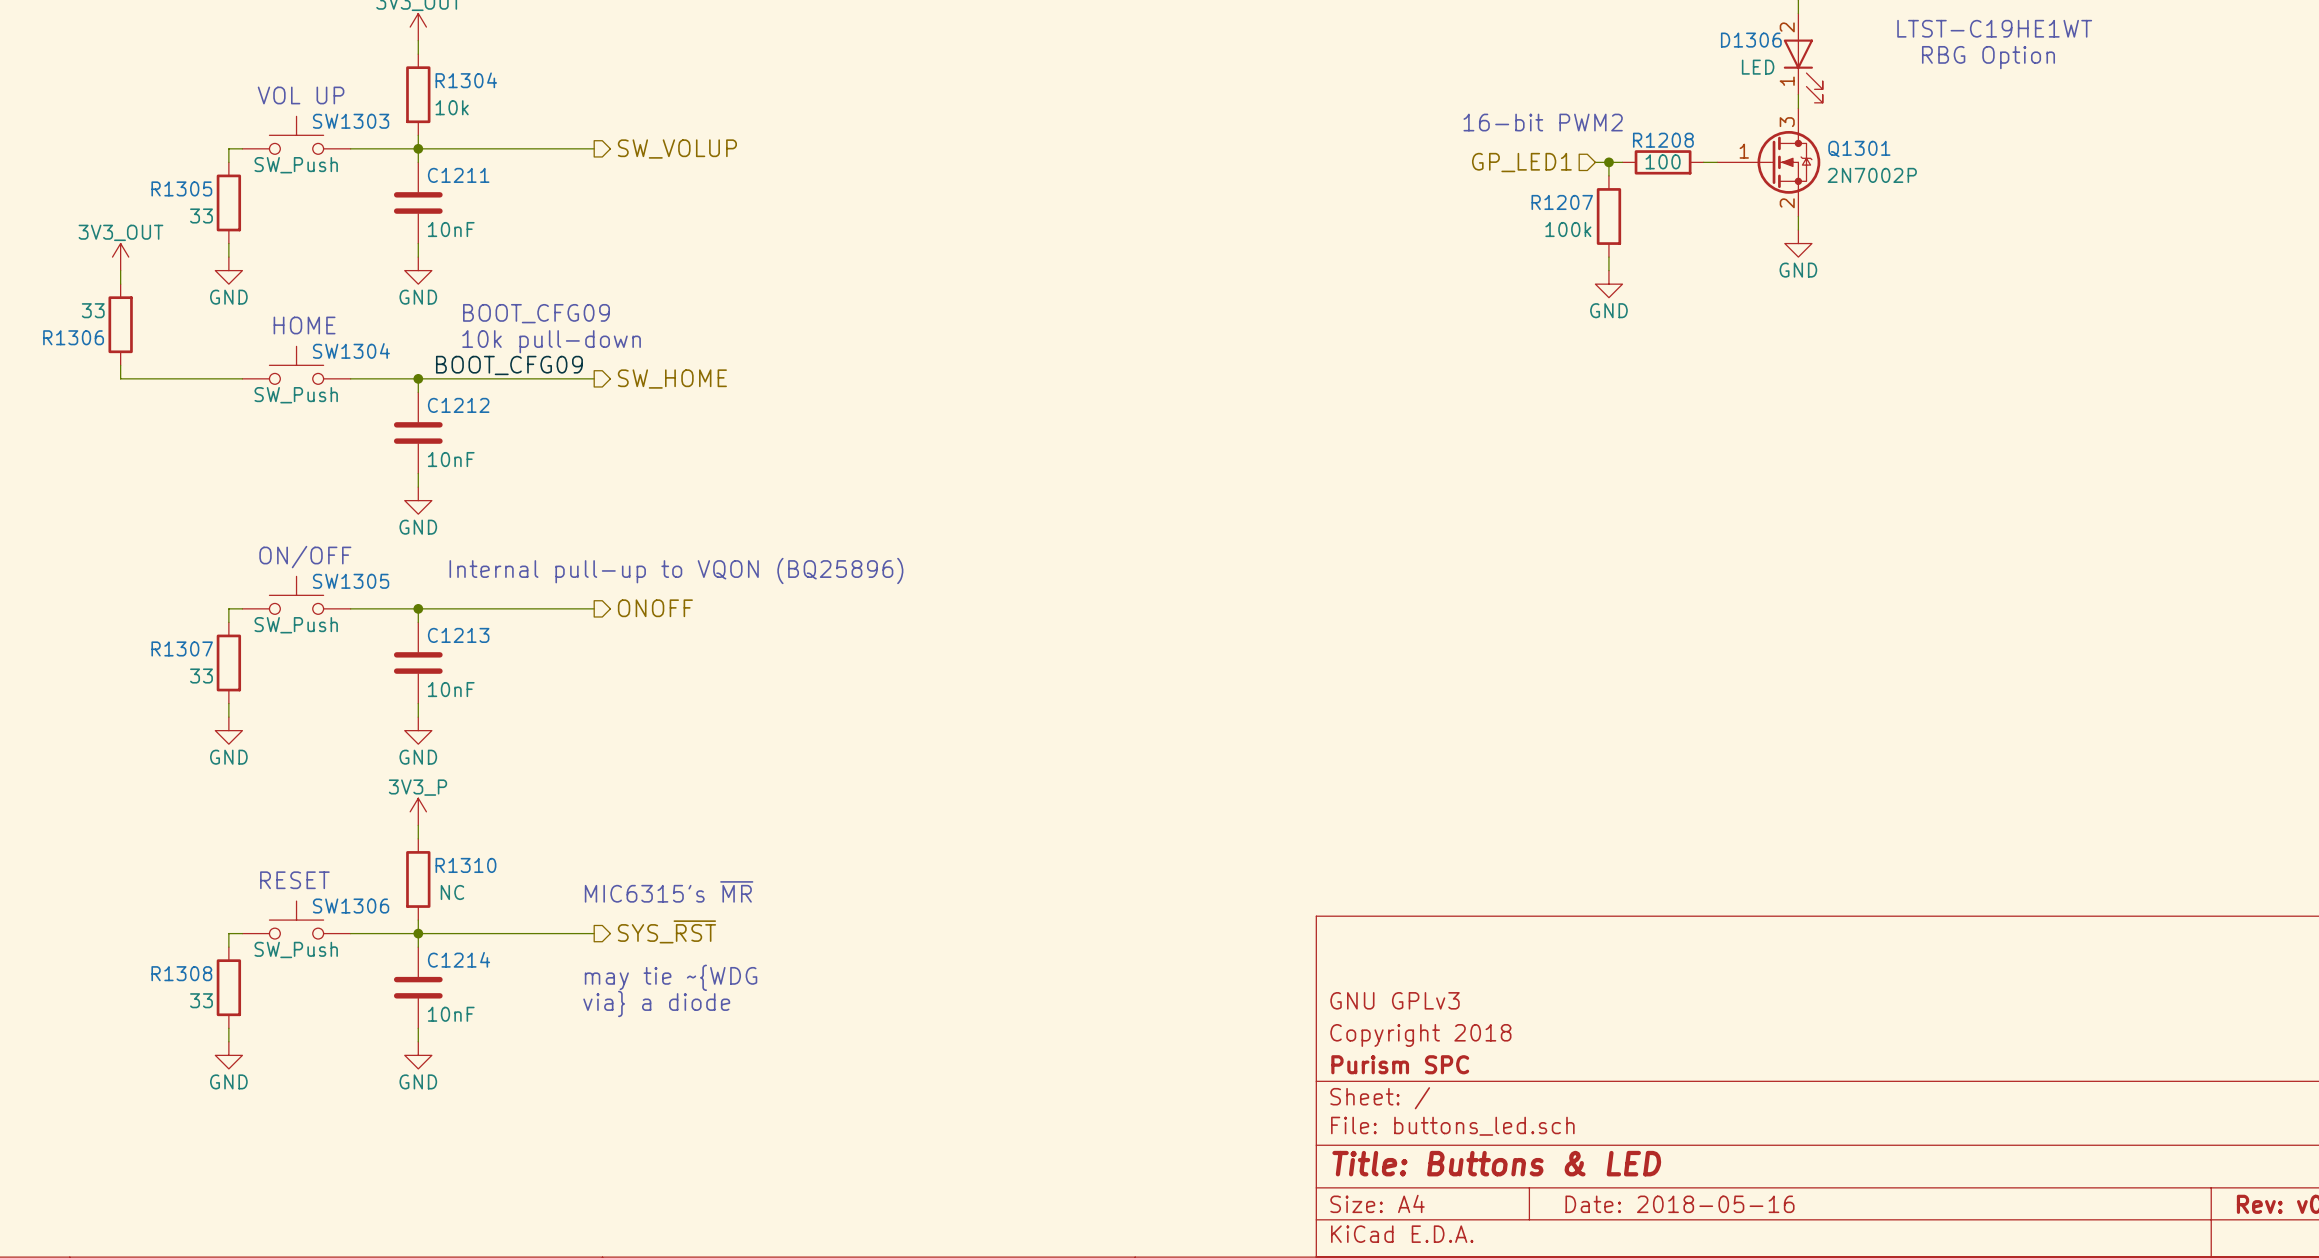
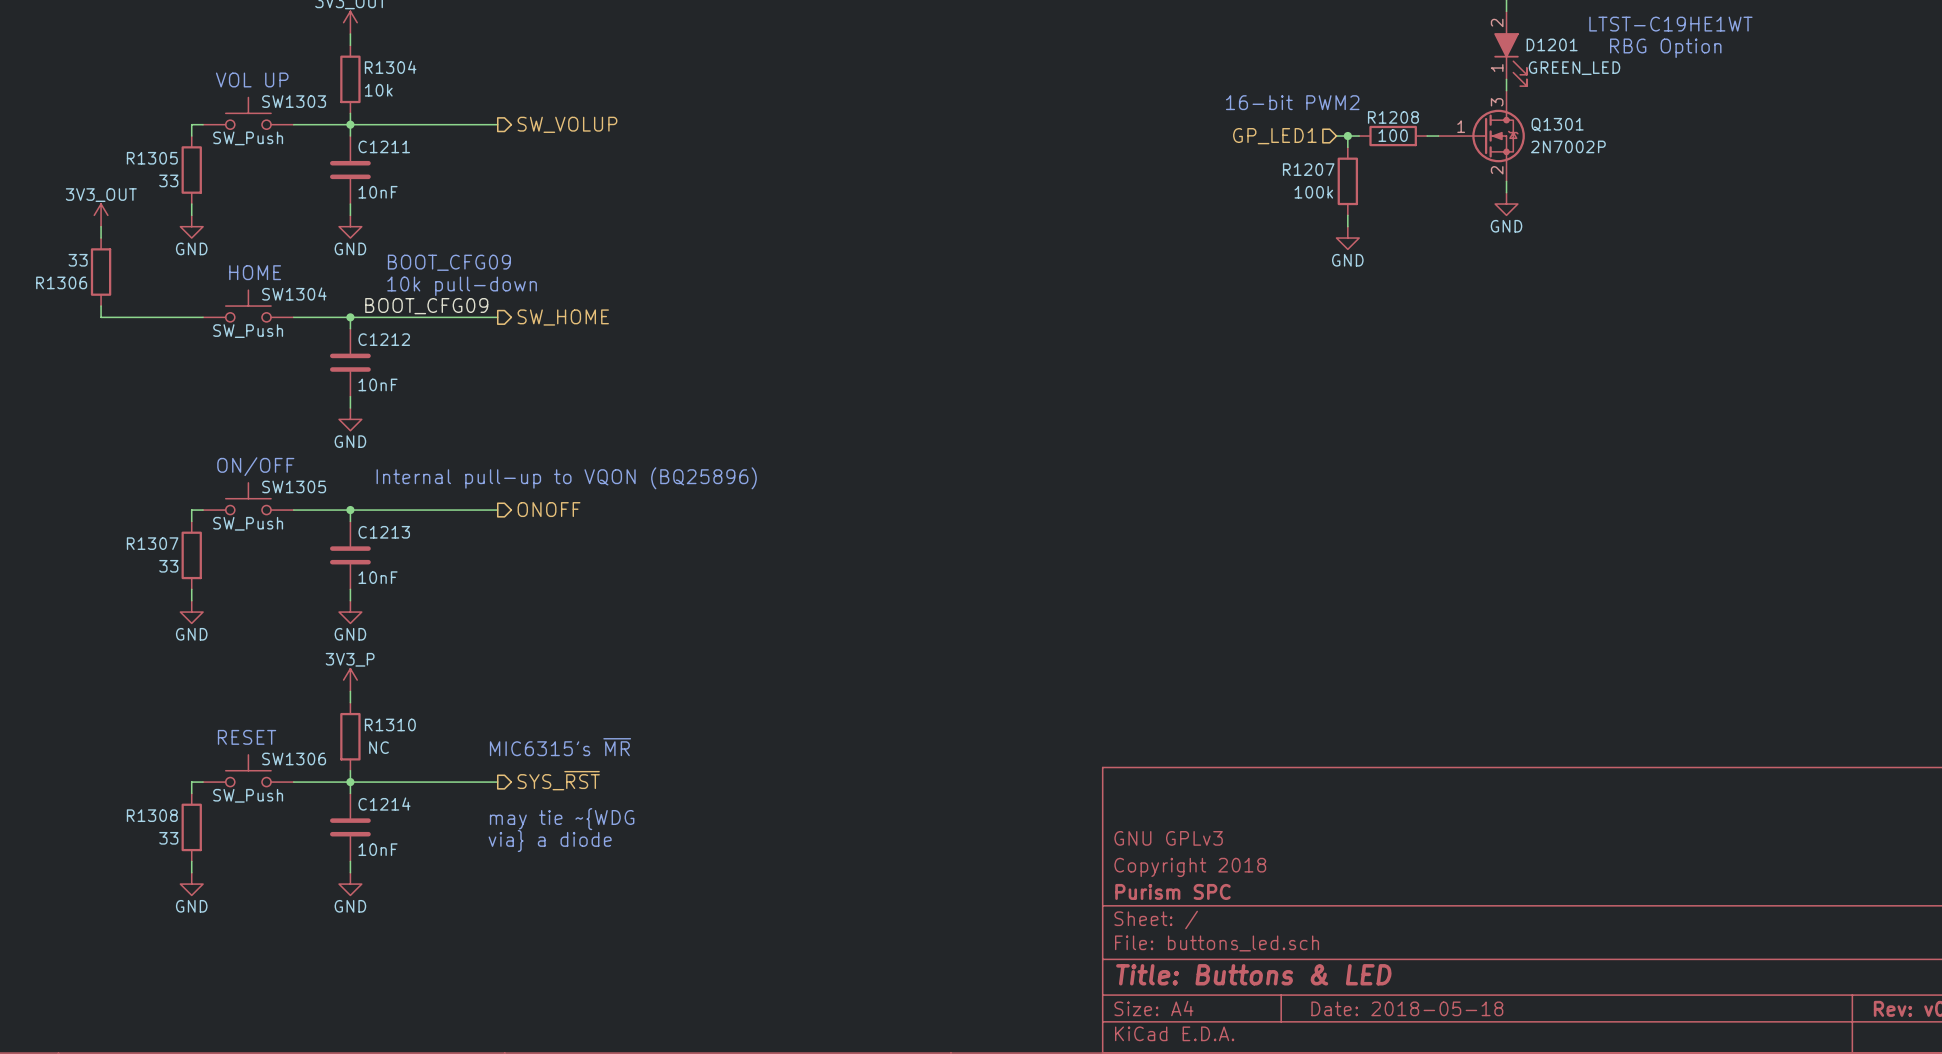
D1306: LED (1803, 58) -> none
D1201: none -> GREEN_LED (1510, 48)
title block: Date: 2018-05-16 (1680, 1204) -> Date: 2018-05-18 (1407, 1008)

